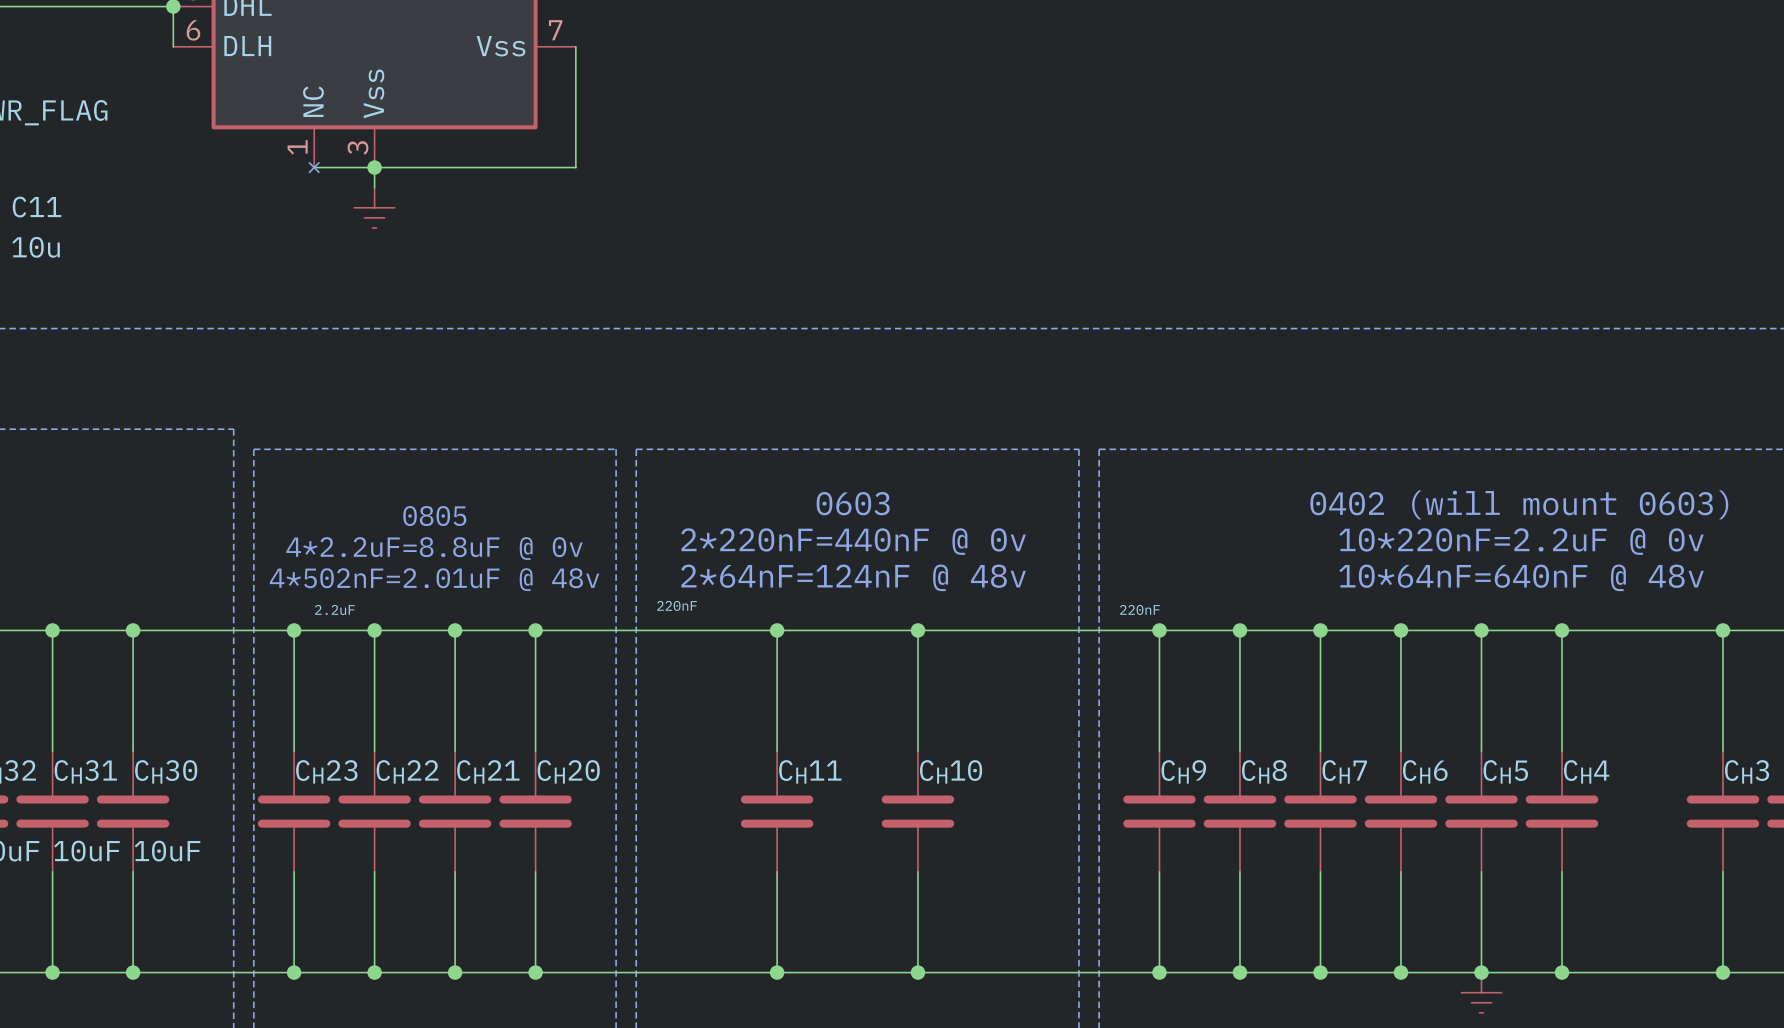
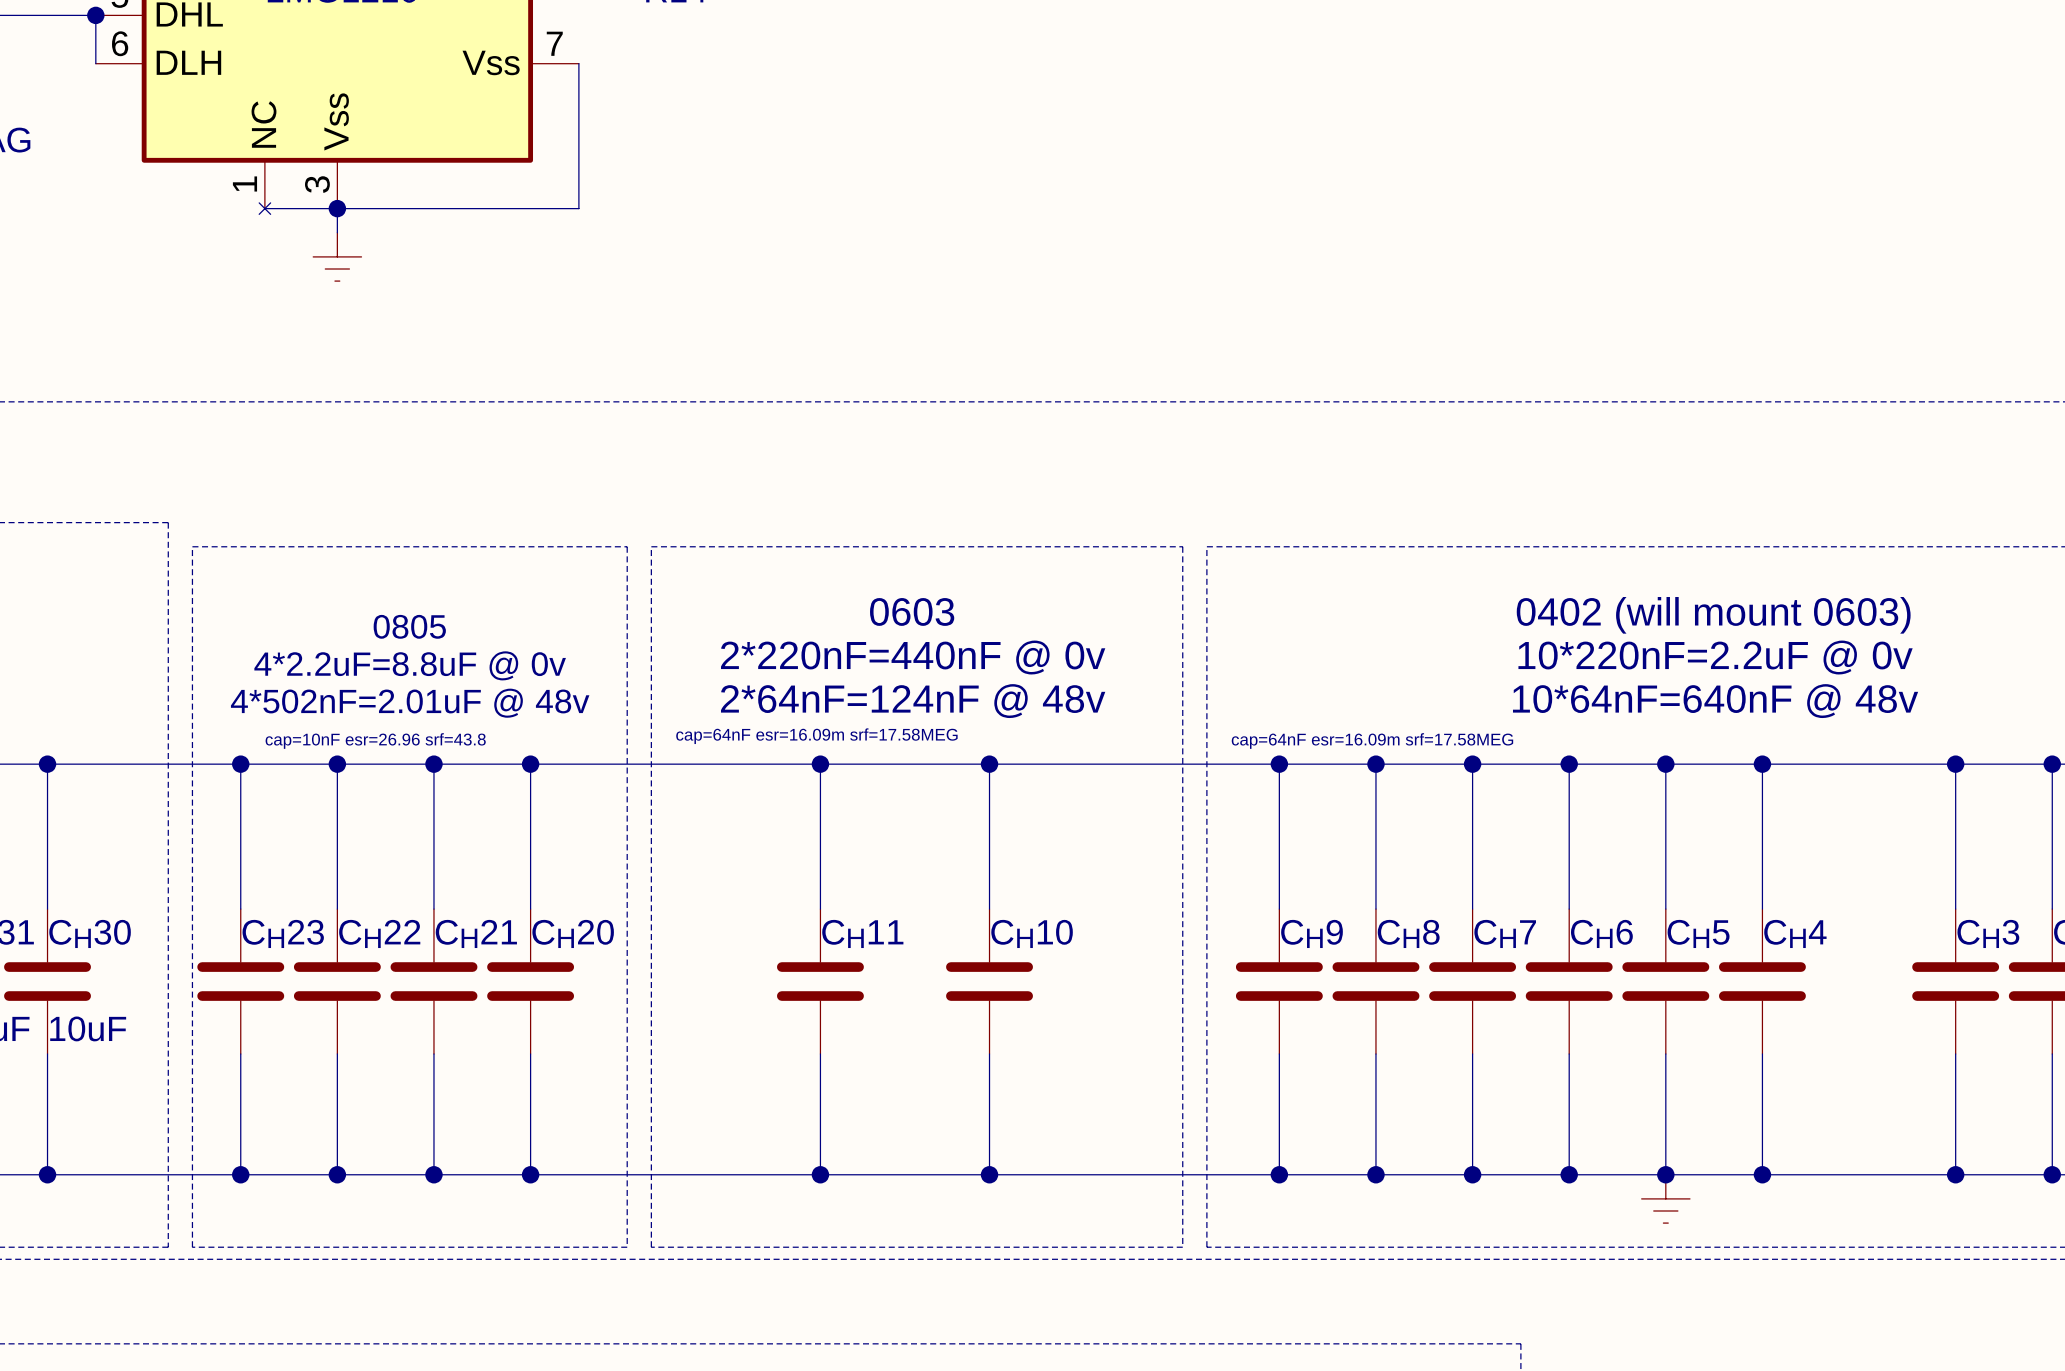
CH11 value: 220nF (677, 605) -> cap=64nF esr=16.09m srf=17.58MEG (816, 736)
CH23 value: 2.2uF (334, 609) -> cap=10nF esr=26.96 srf=43.8 (375, 741)
CH9 value: 220nF (1139, 609) -> cap=64nF esr=16.09m srf=17.58MEG (1372, 741)

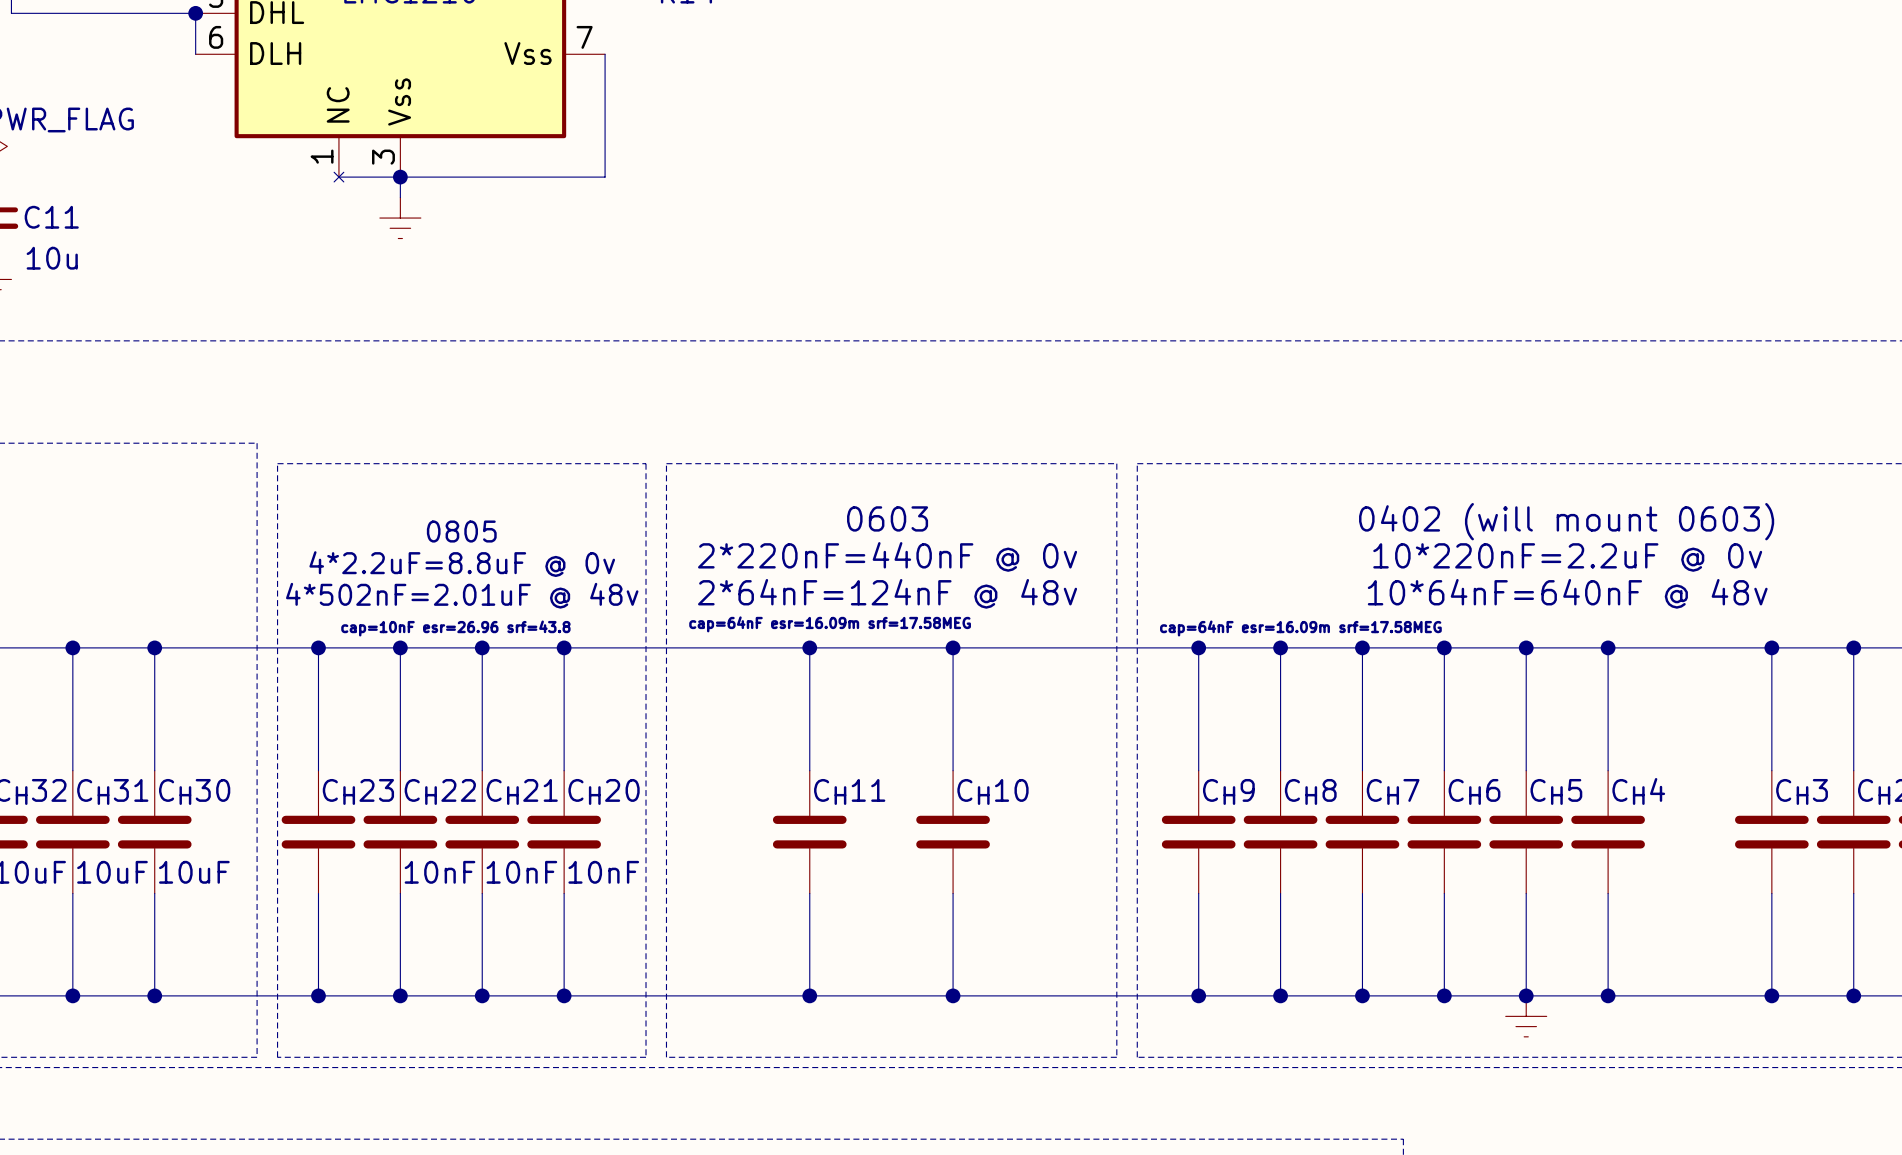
CH22 value: none -> 10nF (439, 872)
CH21 value: none -> 10nF (521, 872)
CH20 value: none -> 10nF (603, 872)

